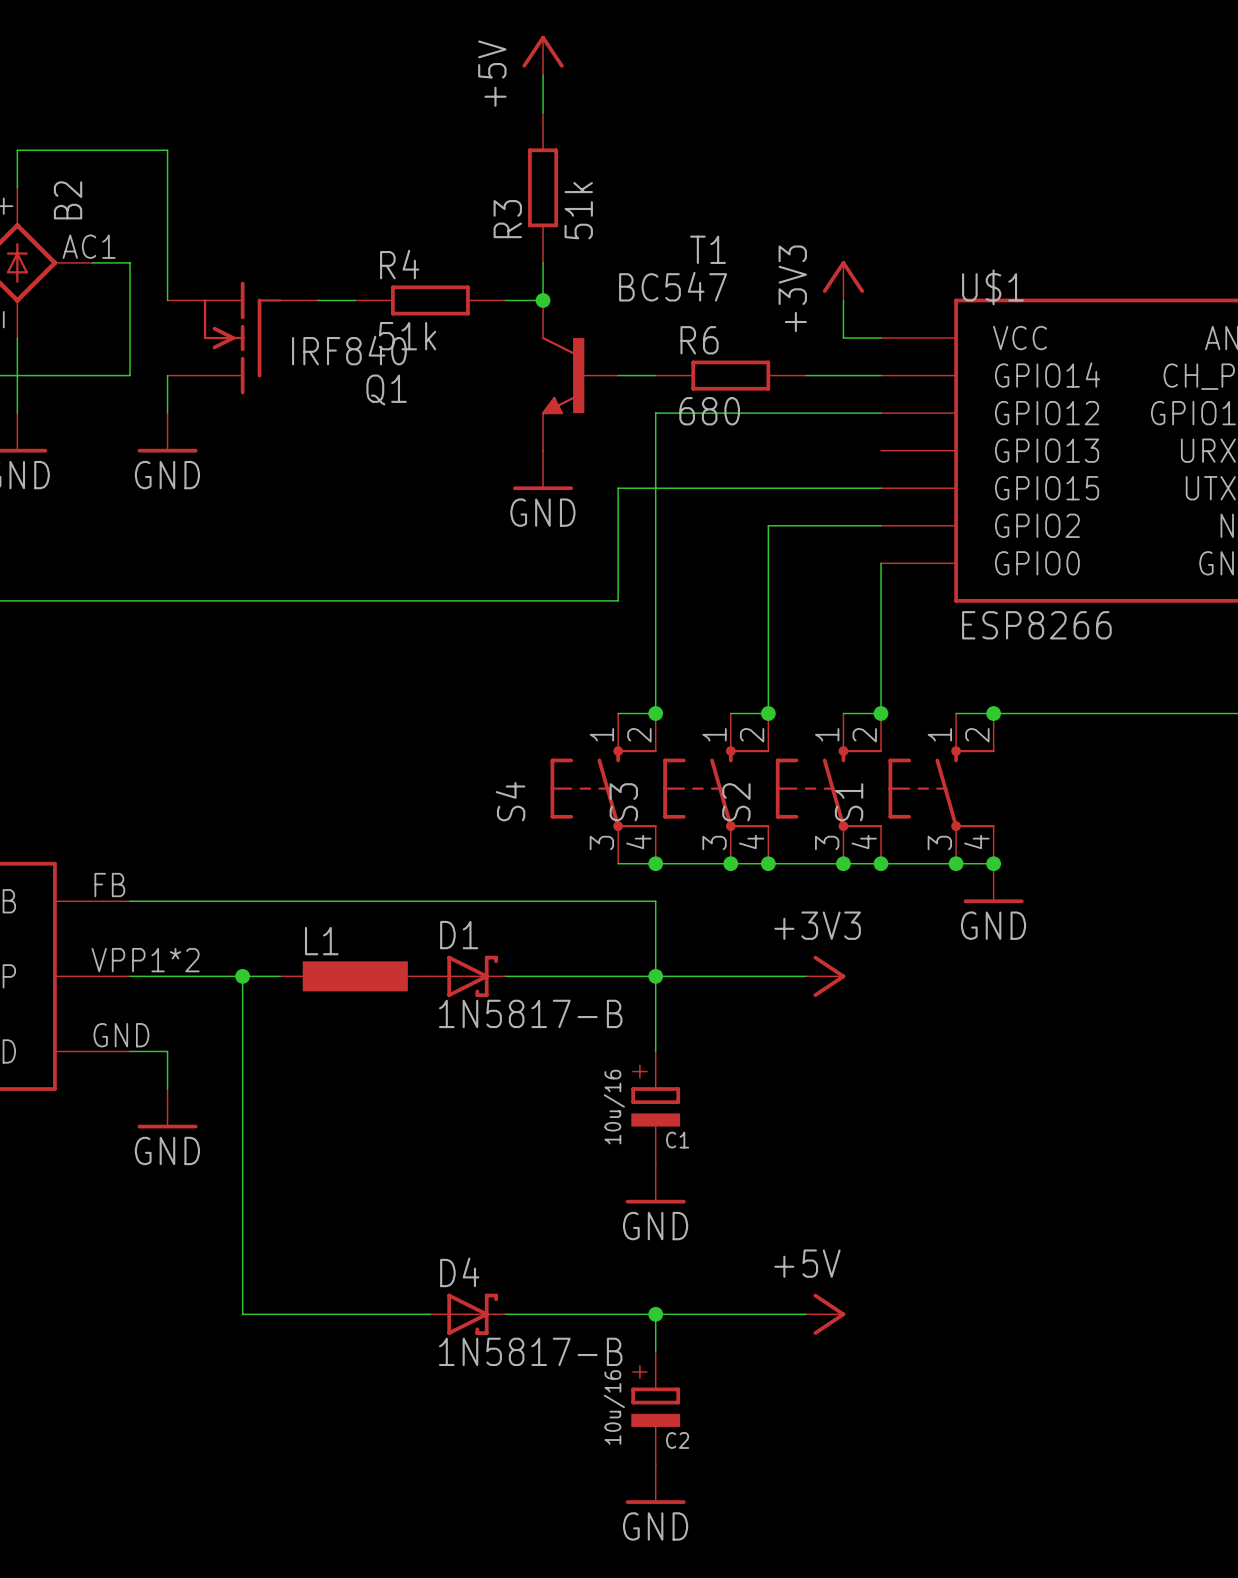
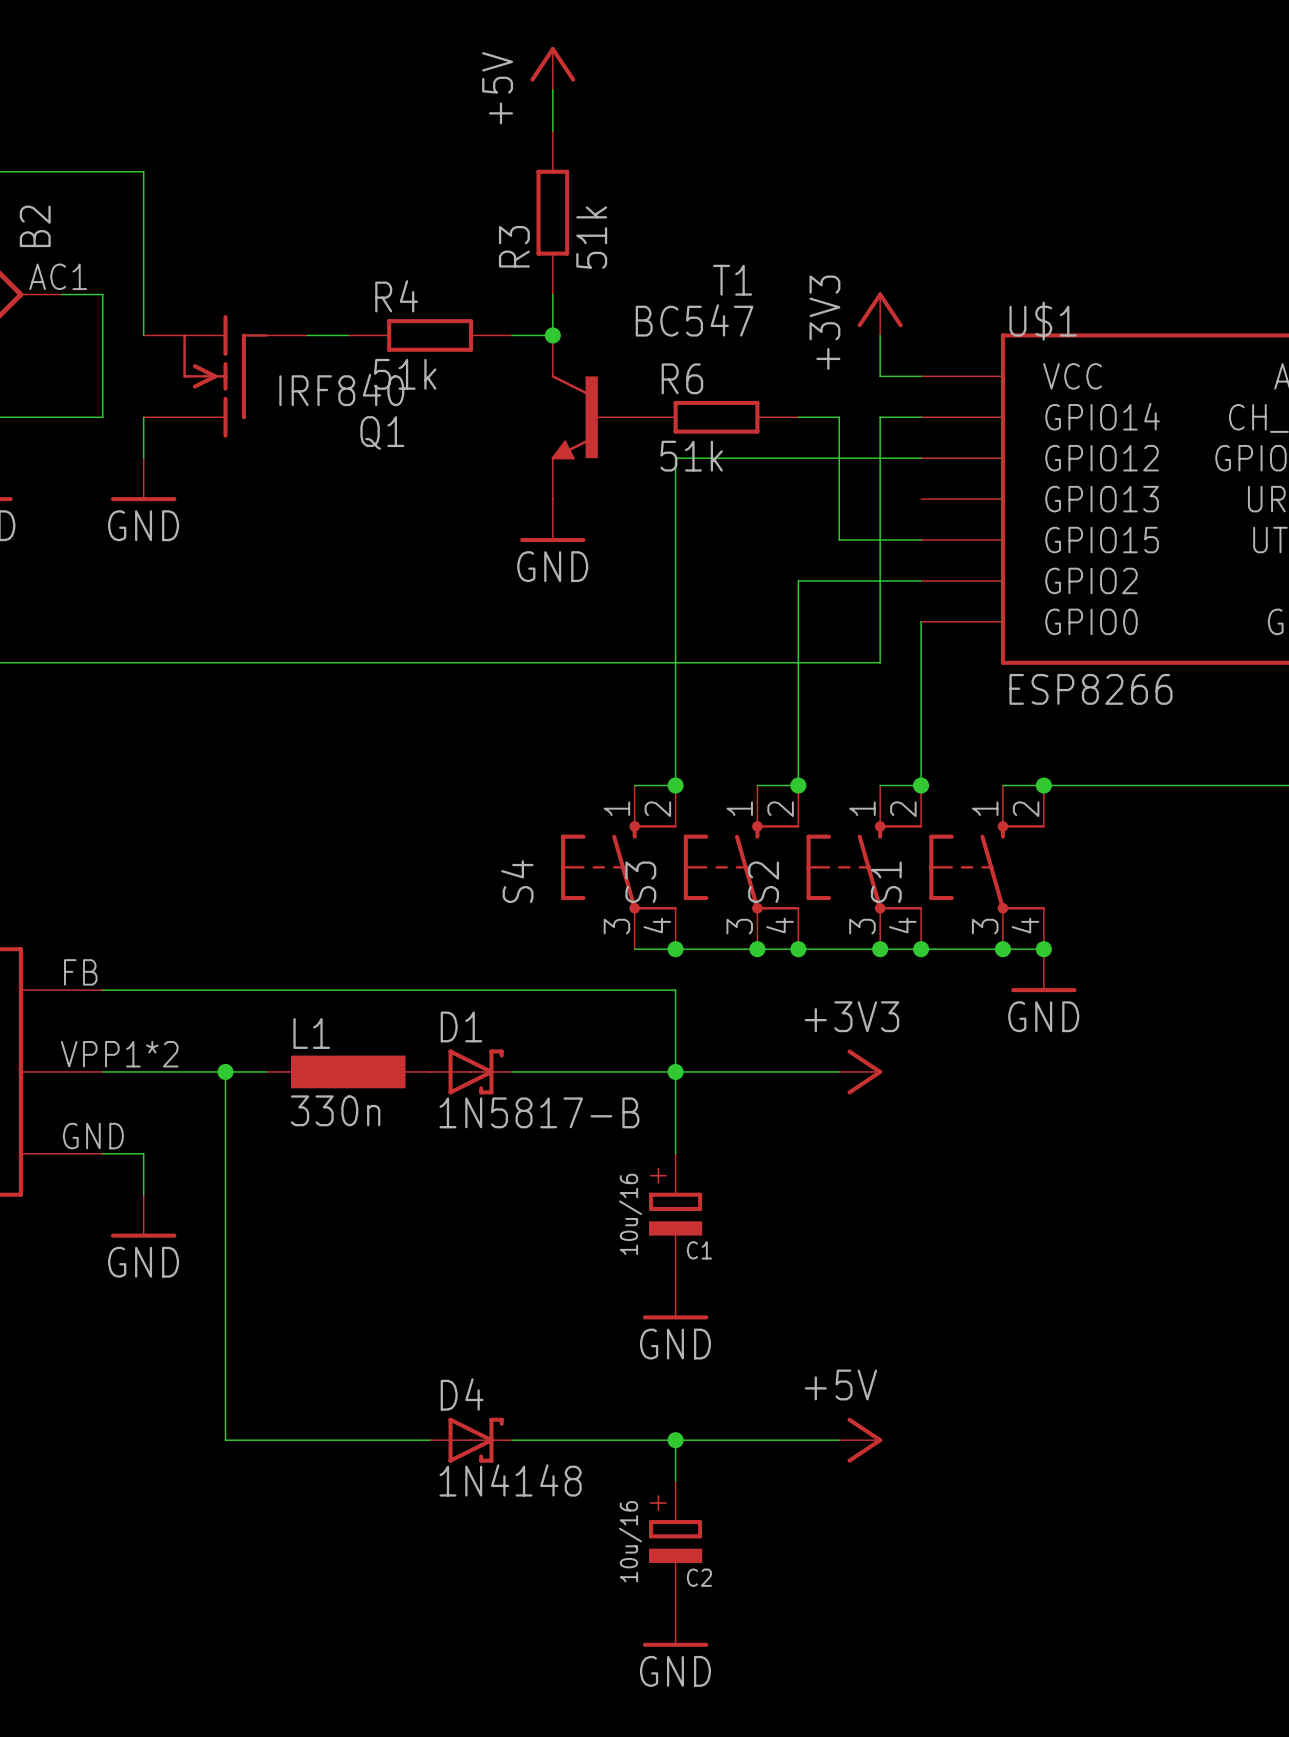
R6 position: (730, 375) -> (716, 417)
wire: none -> (798, 417) (839, 417) (839, 540)
wire: (805, 375) (843, 375) -> none
R6 value: 680 (709, 411) -> 51k (691, 456)
wire: (805, 488) (618, 488) (618, 600) -> (880, 417) (880, 662) (634, 662)
L1 value: none -> 330n (335, 1110)
D4 value: 1N5817-B (530, 1351) -> 1N4148 (510, 1480)

